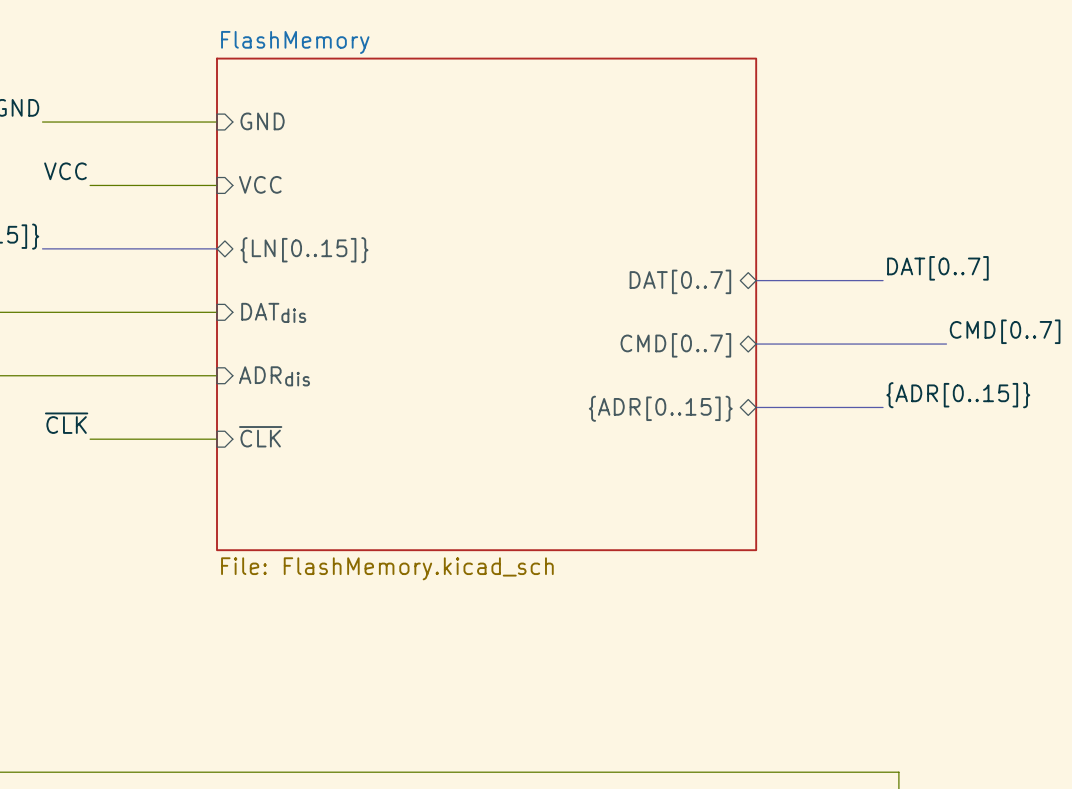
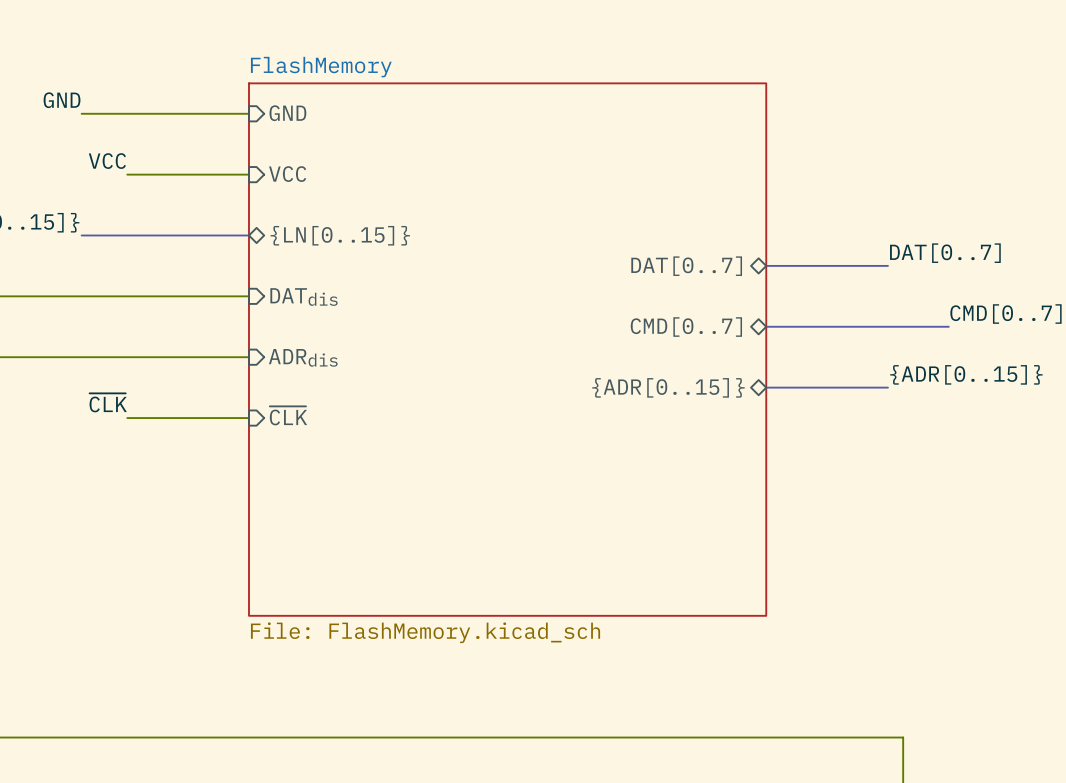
sheet FlashMemory: File: FlashMemory.kicad_sch (486, 304) -> none
sheet FlashMemory: none -> File: FlashMemory.kicad_sch (507, 349)

